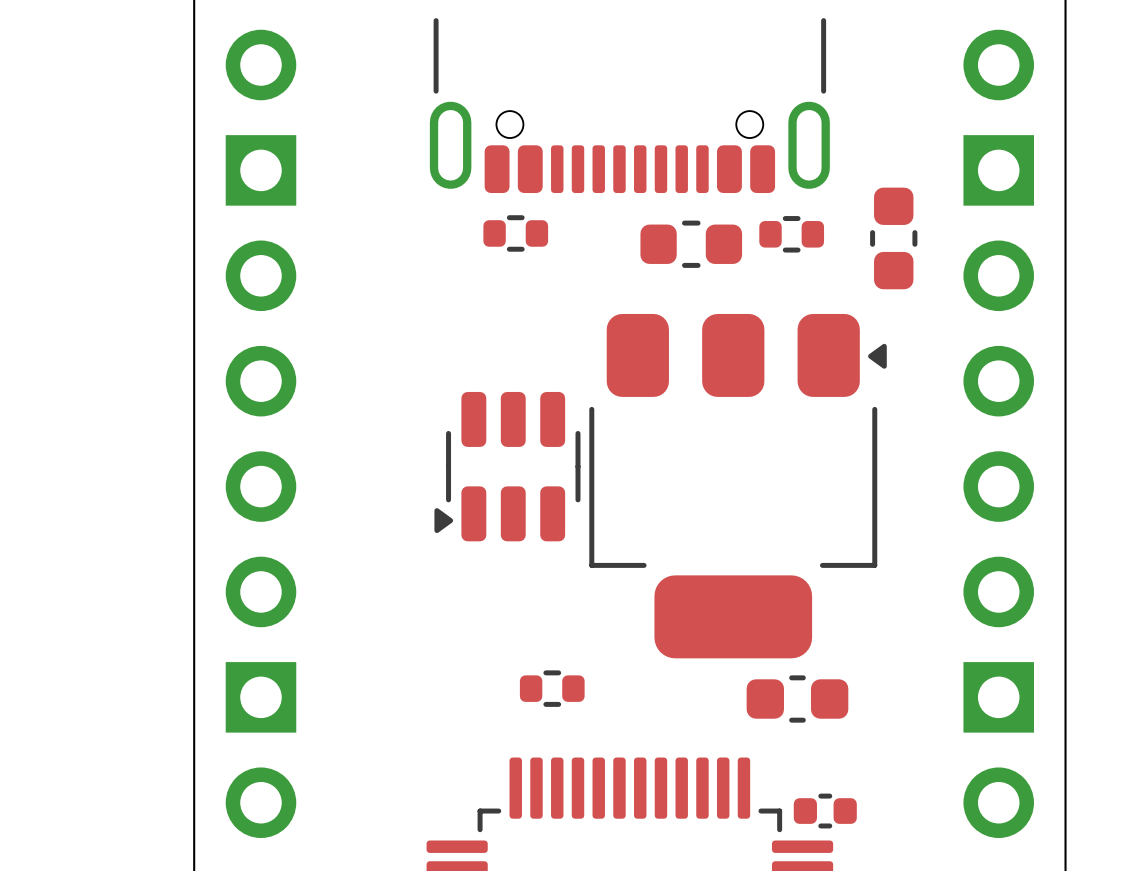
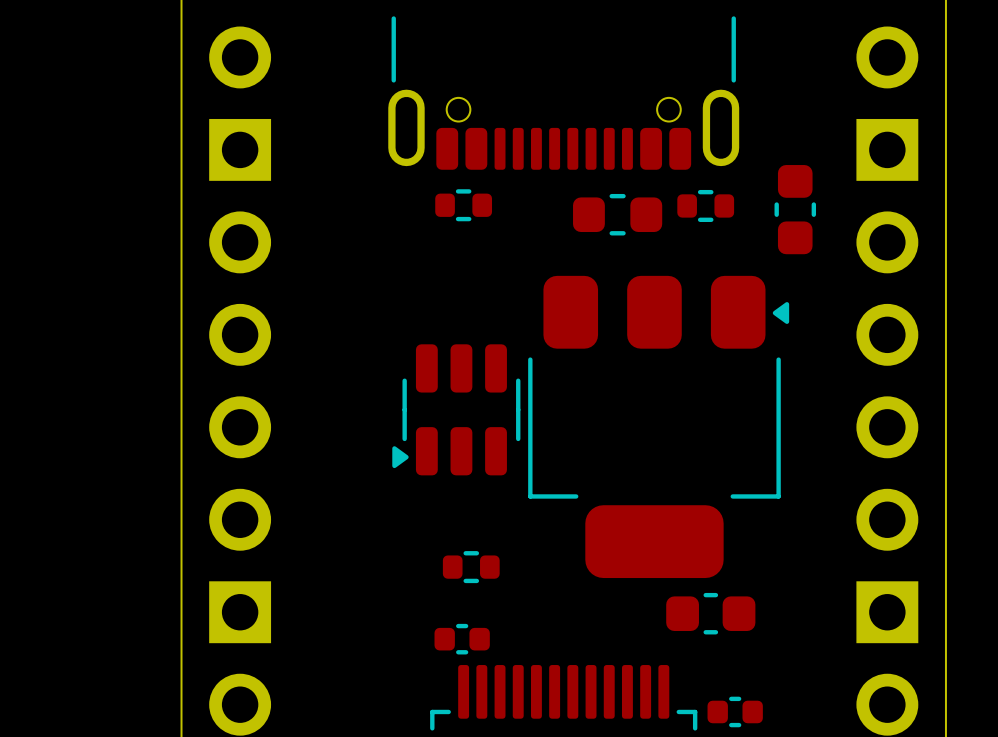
part position: (552, 688) -> (471, 567)
part: none -> (462, 639)

